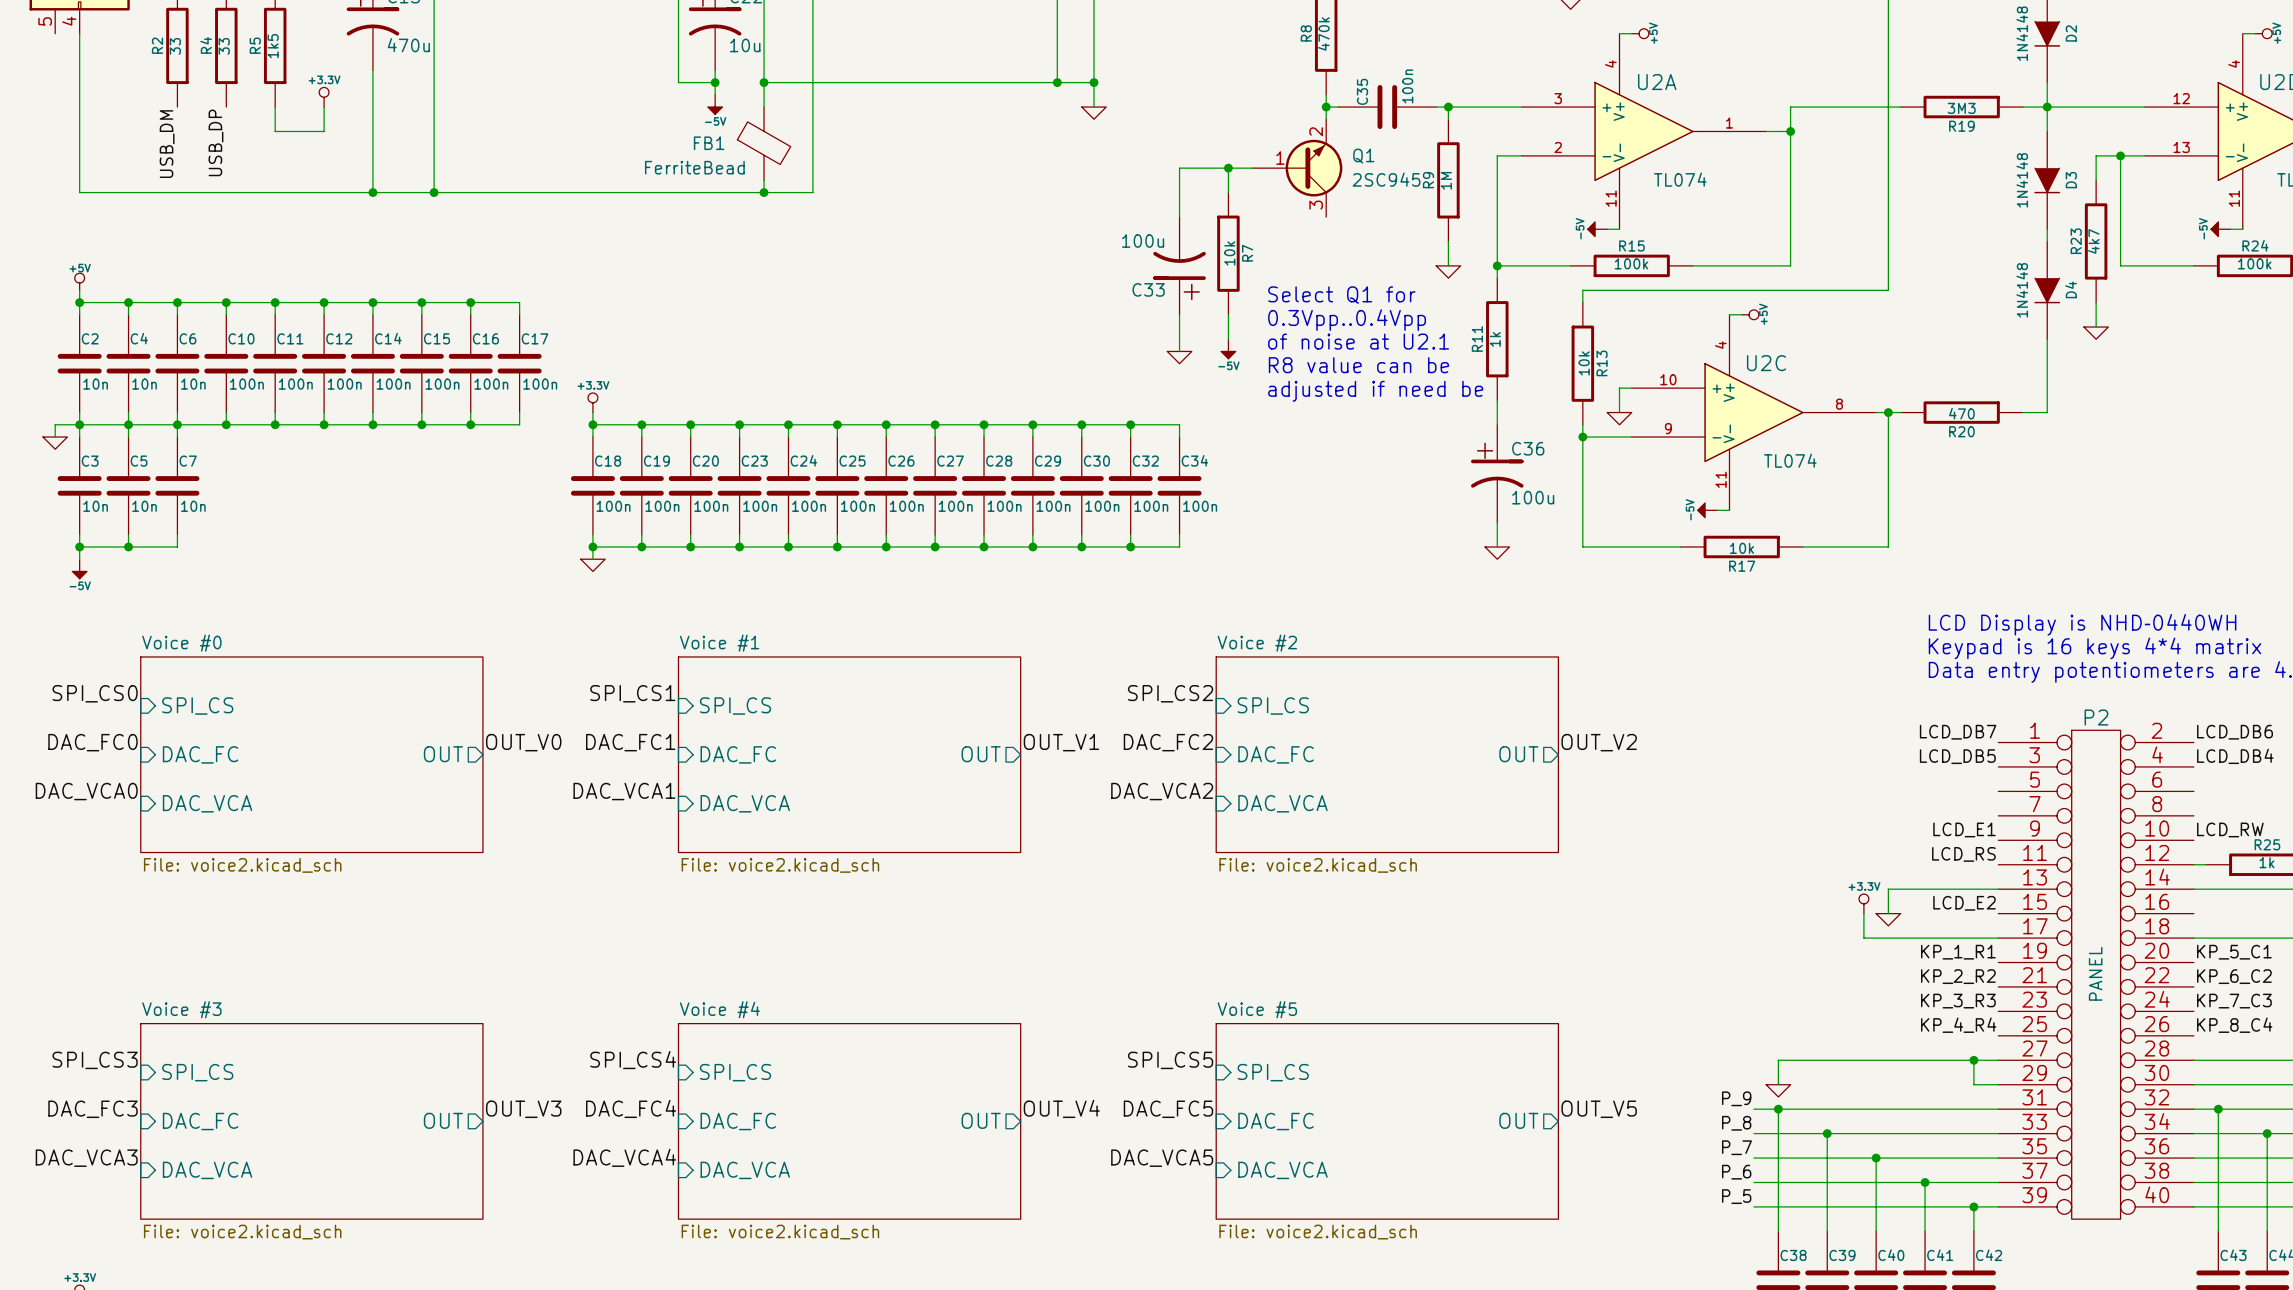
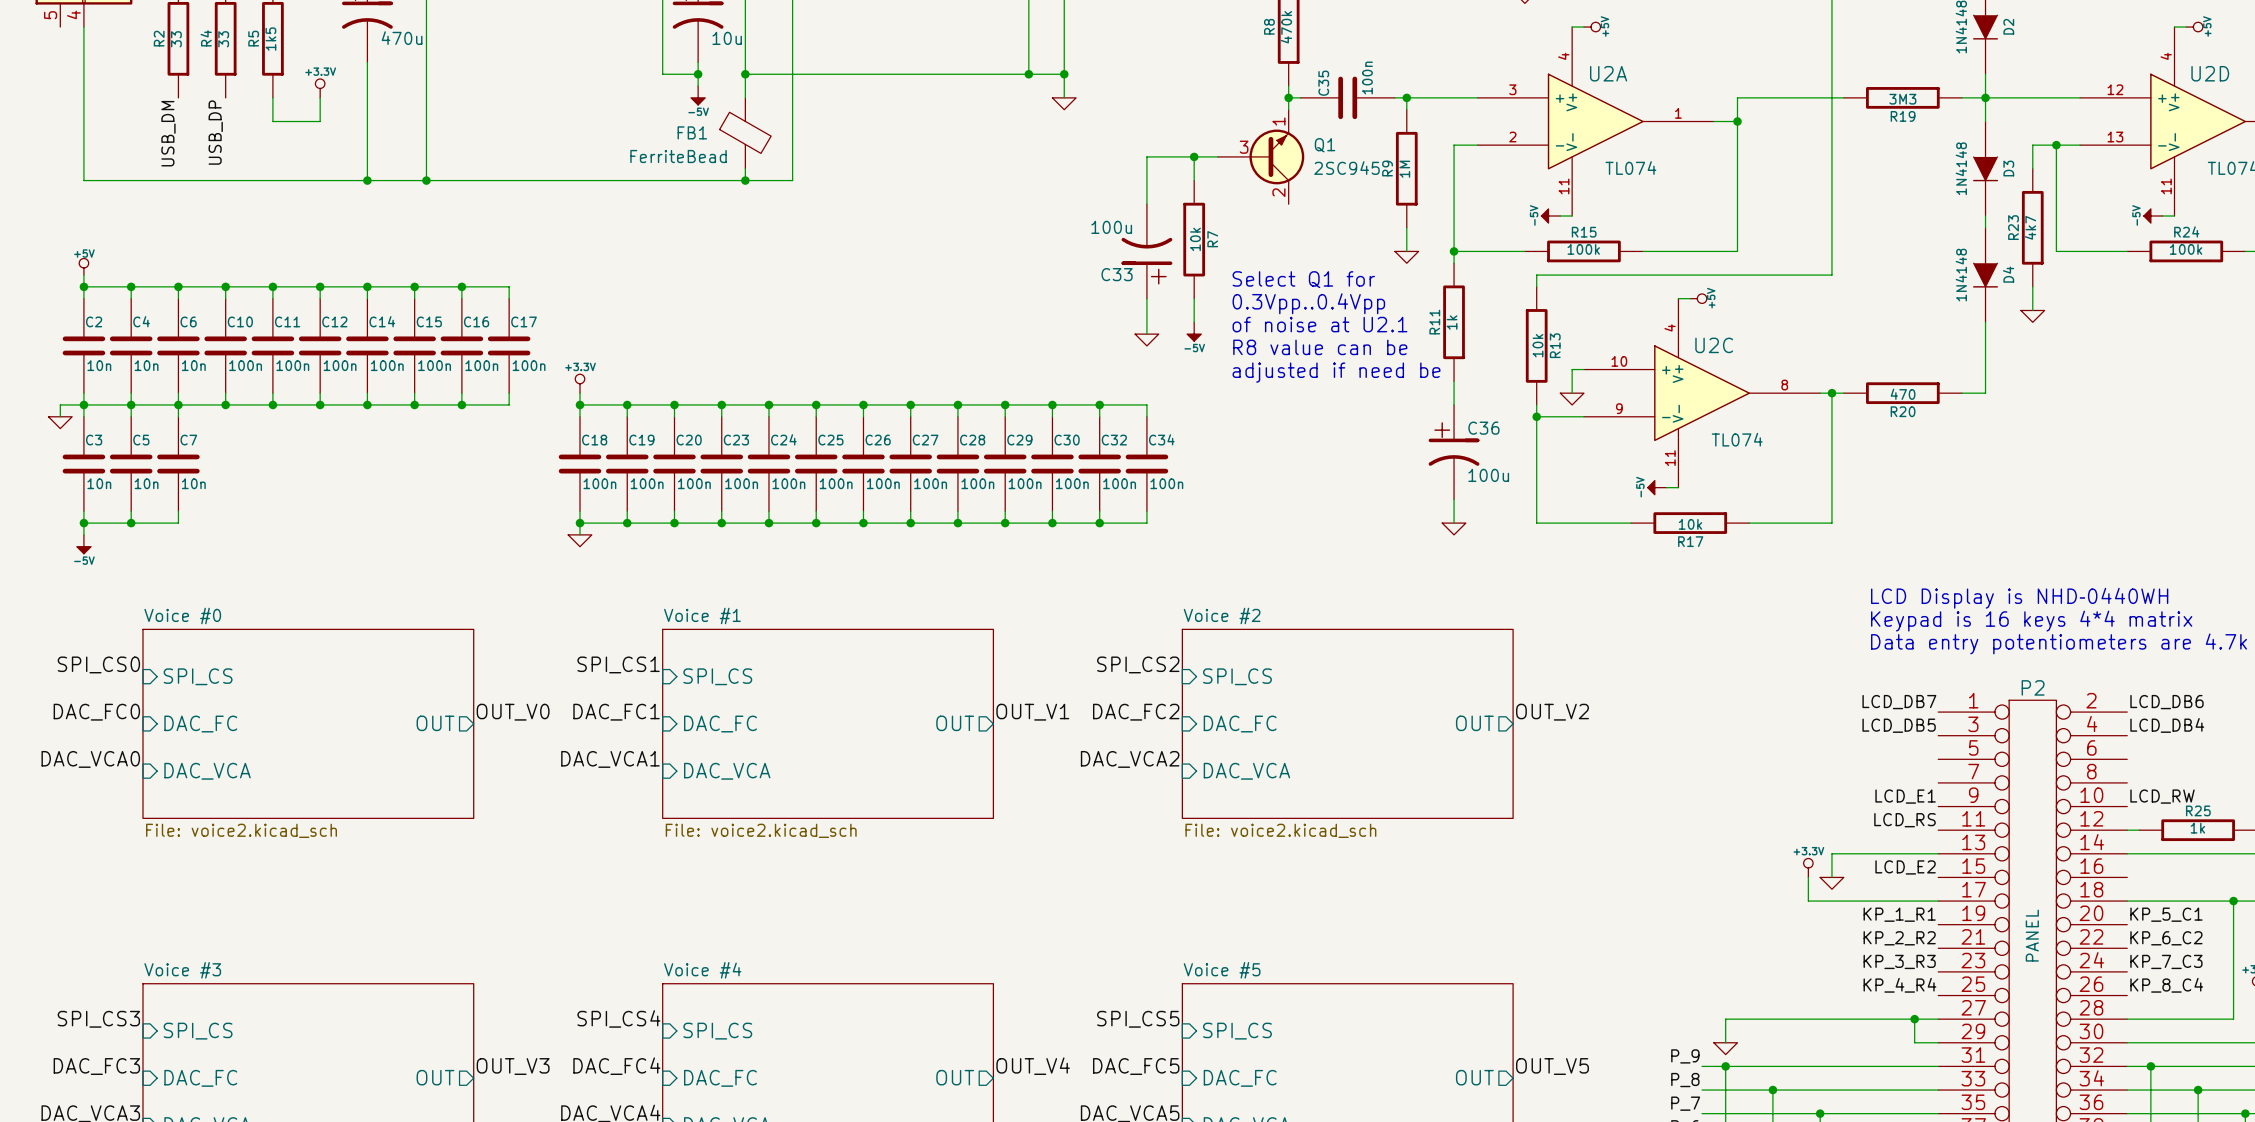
Q1 pin number: 2 (1316, 131) -> 1 (1278, 121)
Q1 pin number: 1 (1280, 158) -> 3 (1244, 147)
Q1 pin number: 3 (1316, 205) -> 2 (1278, 192)

